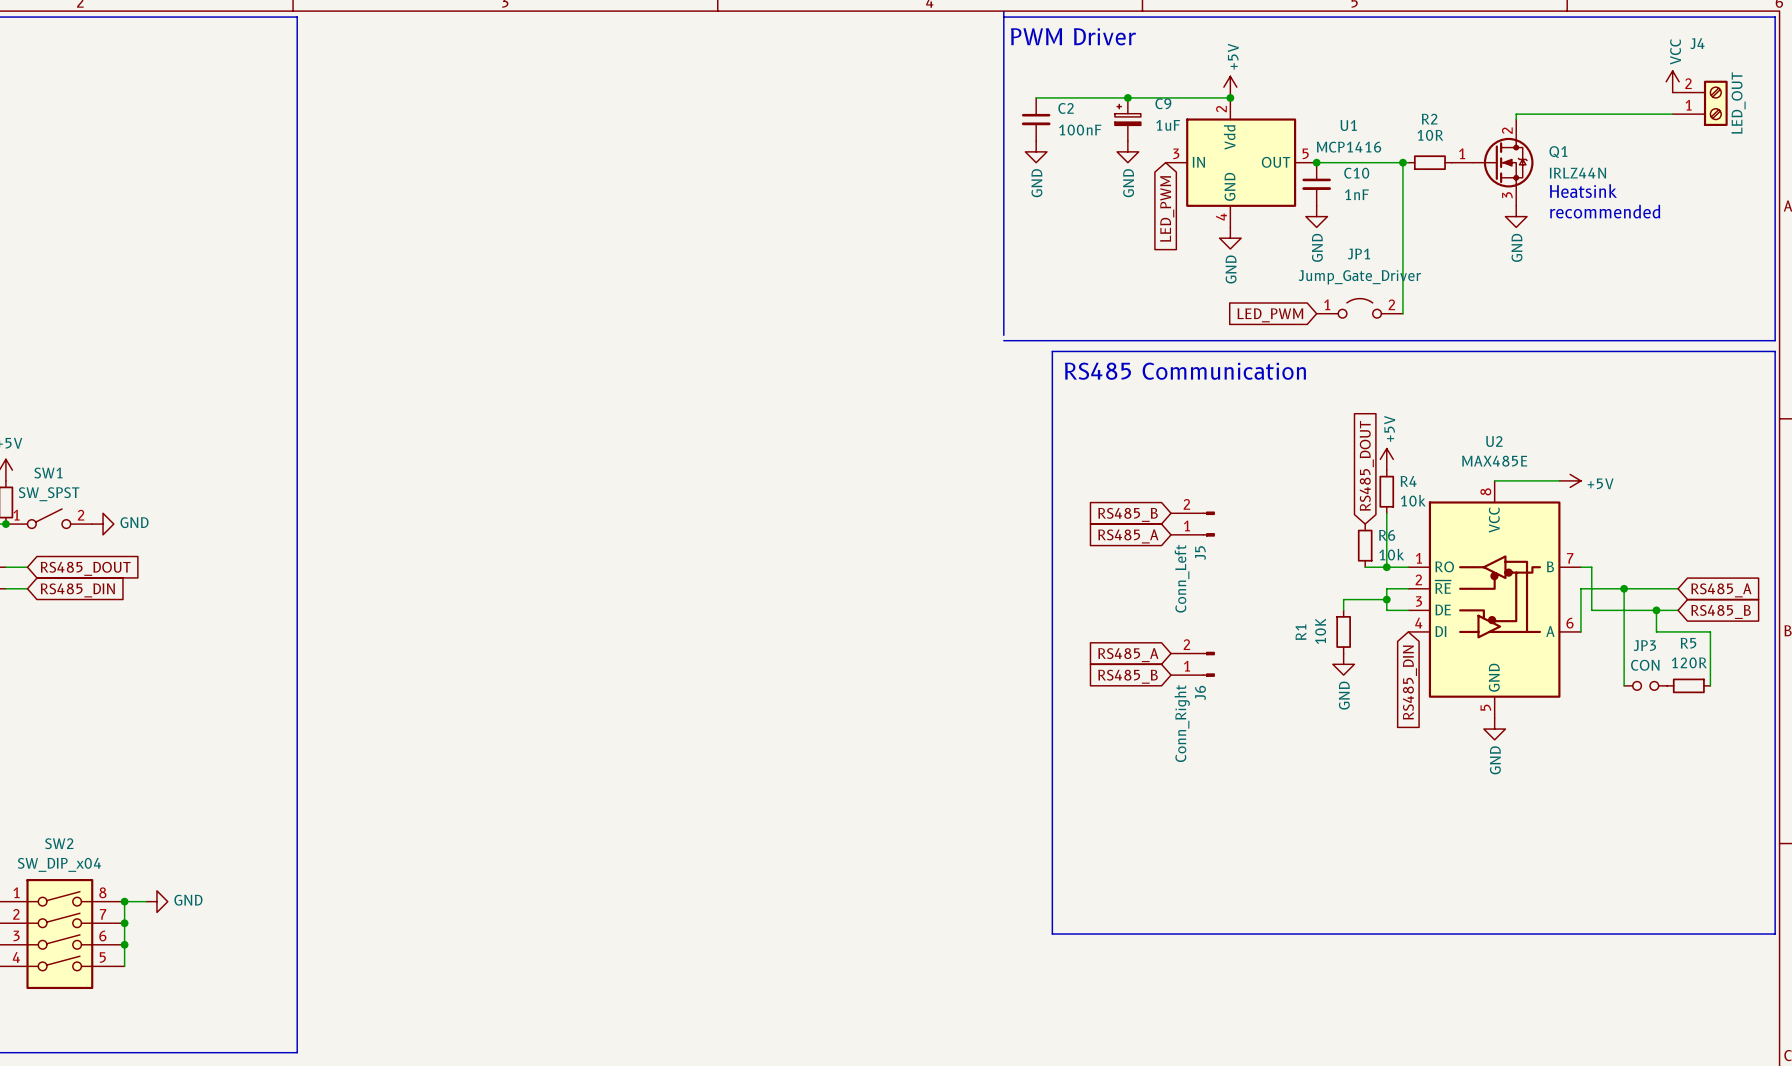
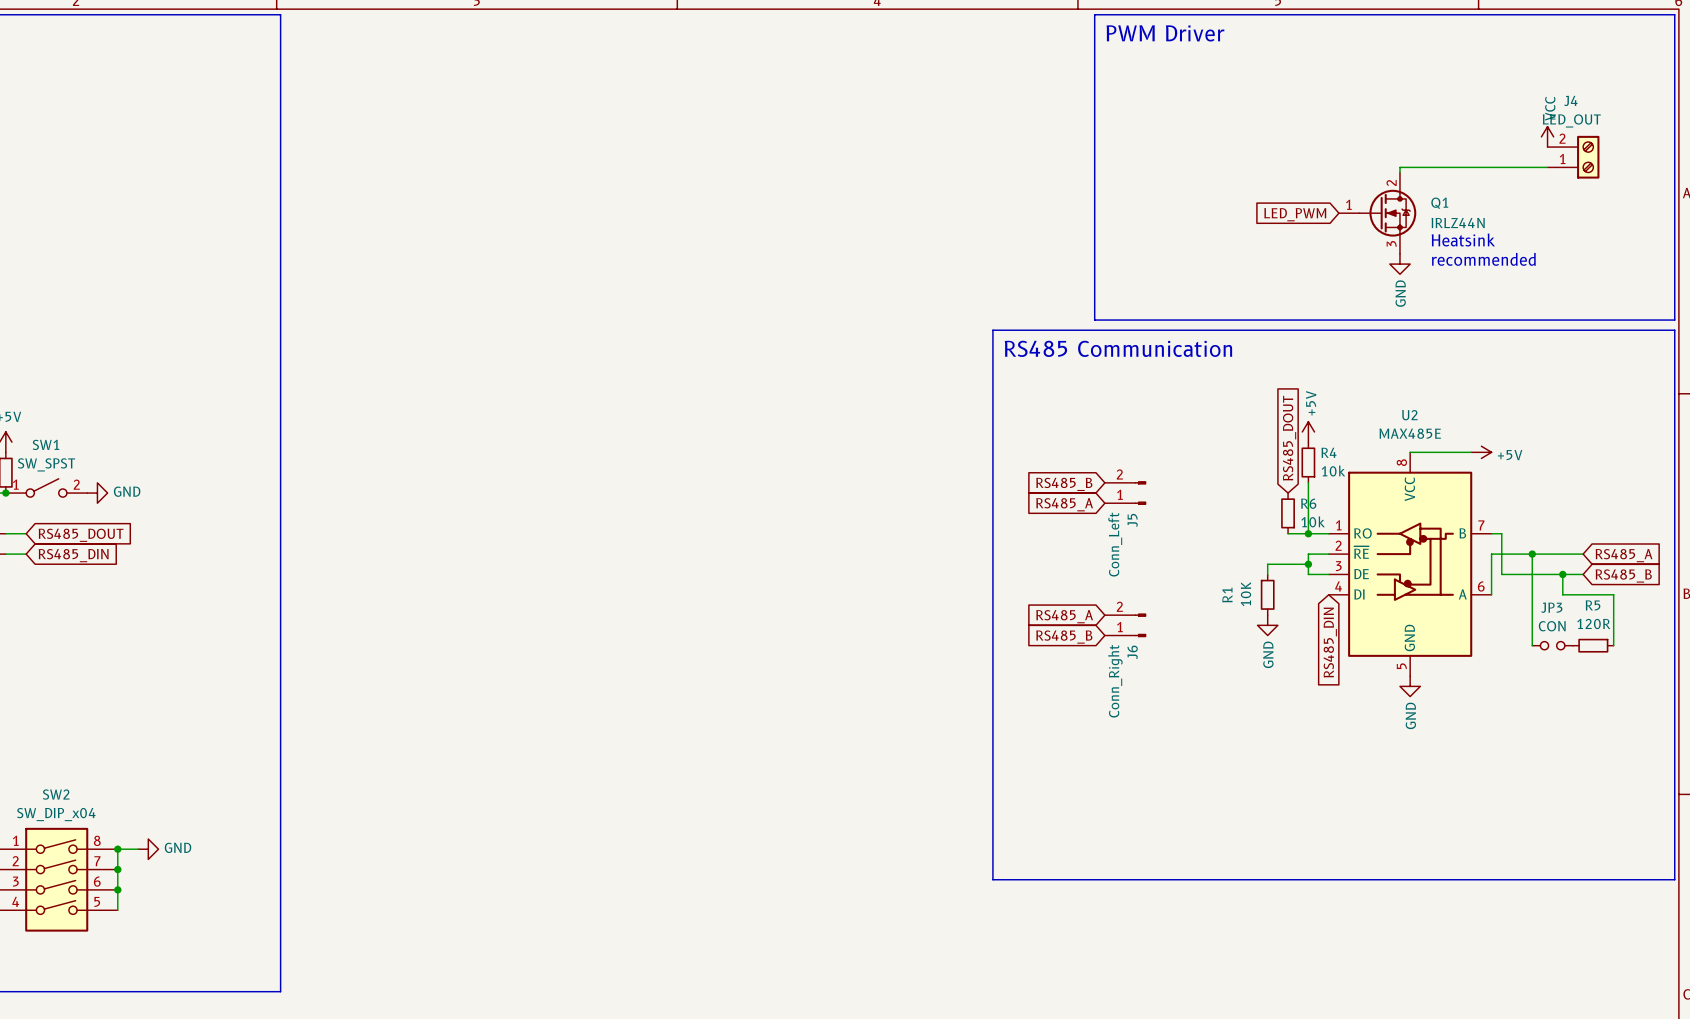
line: (1003, 11) (1003, 335) -> none
line: (1003, 17) (1160, 17) -> (1094, 320) (1094, 14)
text position: PWM Driver (1073, 36) -> PWM Driver (1165, 33)
power symbol position: VCC (1672, 81) -> VCC (1547, 136)
power symbol: +5V (1230, 87) -> none
wire: (1036, 97) (1230, 97) -> none
junction: (1127, 97) -> none
junction: (1230, 97) -> none
J4 position: (1700, 103) -> (1573, 157)
J4 value rotation: 0° (1738, 103) -> 90° clockwise (1571, 120)
wire: (1672, 114) (1516, 114) (1516, 119) -> (1547, 167) (1399, 167) (1399, 172)
C2: 100nF (1036, 119) -> none
C9: 1uF (1127, 119) -> none
power symbol: GND (1036, 151) -> none
power symbol: GND (1127, 151) -> none
U1: MCP1416 (1241, 162) -> none
wire: (1316, 162) (1408, 162) -> none
junction: (1316, 162) -> none
wire: (1402, 162) (1402, 313) -> none
junction: (1402, 162) -> none
R2: 10R (1429, 162) -> none
Q1 position: (1492, 162) -> (1377, 213)
C10: 1nF (1316, 184) -> none
text position: Heatsink (1583, 191) -> Heatsink (1463, 240)
global label: LED_PWM (1167, 208) -> none
text position: recommended (1605, 211) -> recommended (1483, 259)
power symbol: GND (1316, 216) -> none
power symbol position: GND (1516, 216) -> GND (1399, 264)
global label: none -> LED_PWM (1295, 214)
power symbol: GND (1230, 238) -> none
JP1: Jump_Gate_Driver (1359, 308) -> none
global label: LED_PWM (1270, 315) -> none
line: (1003, 340) (1160, 340) -> none

